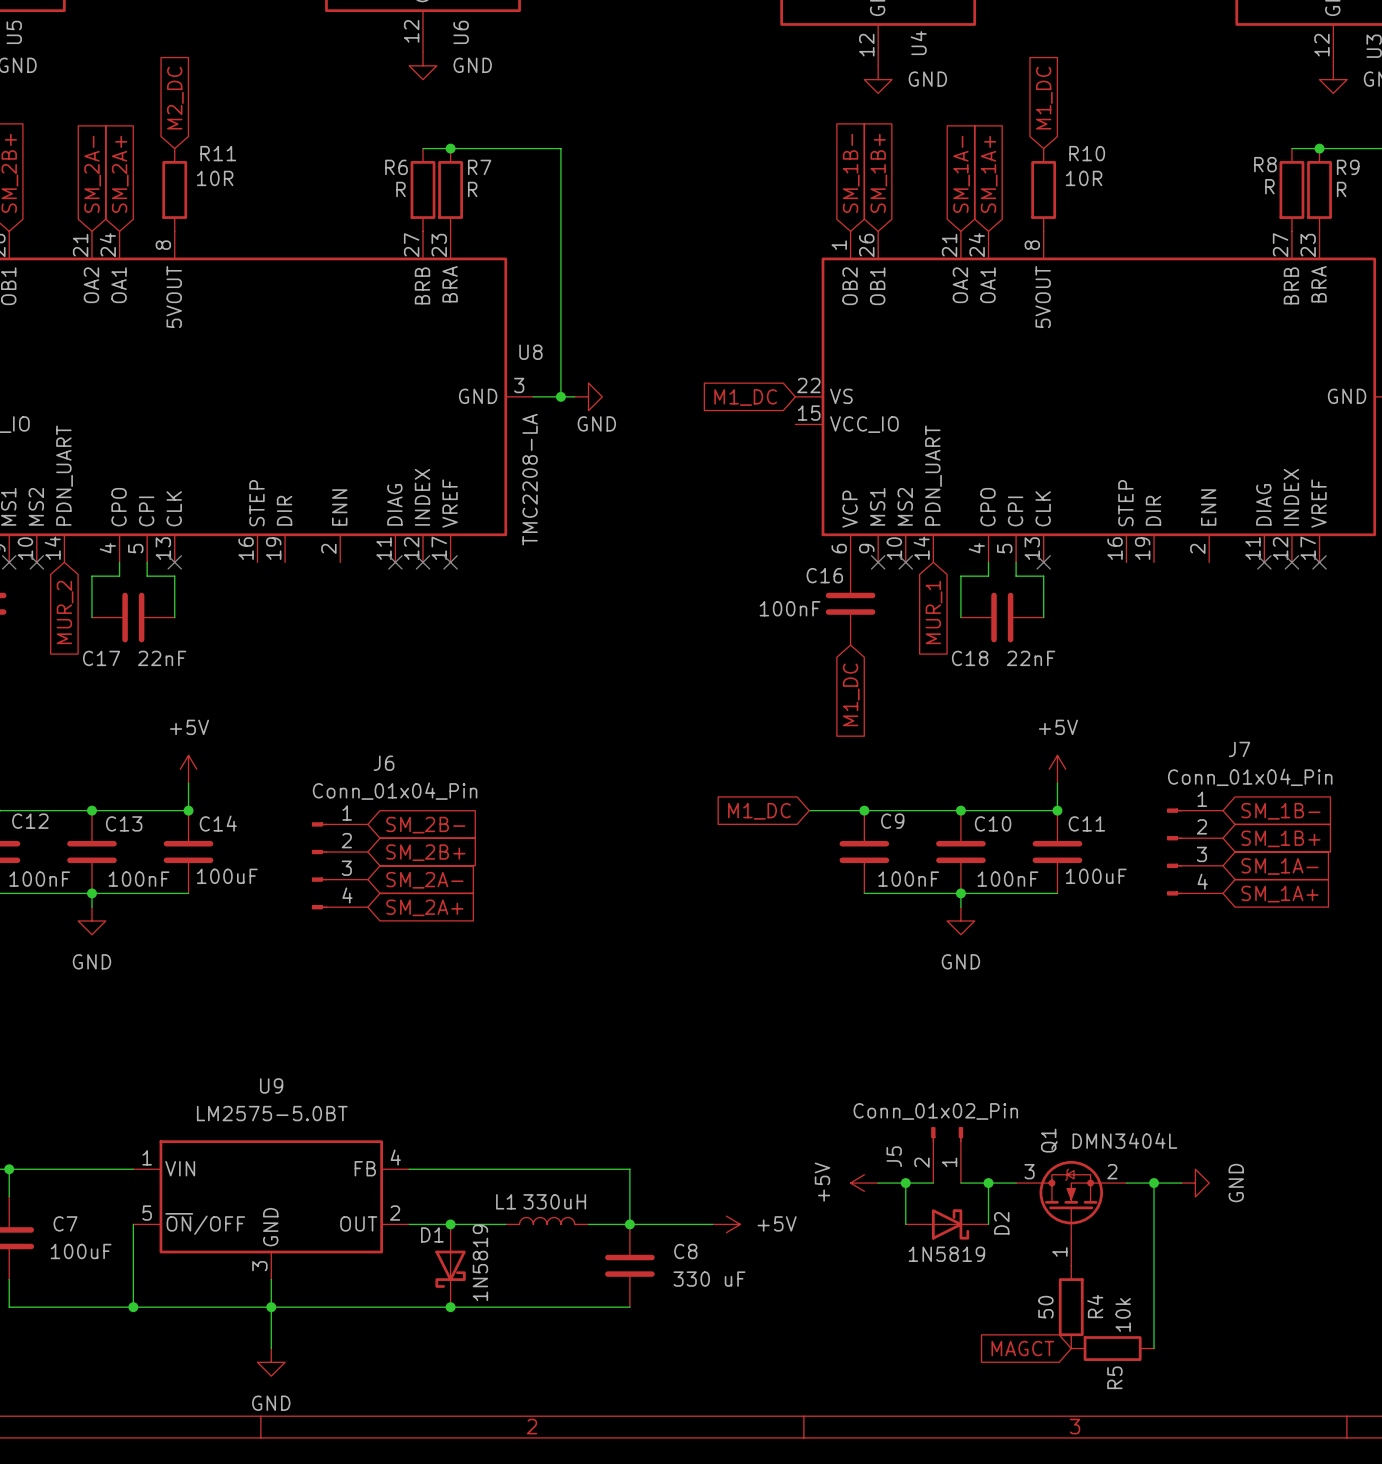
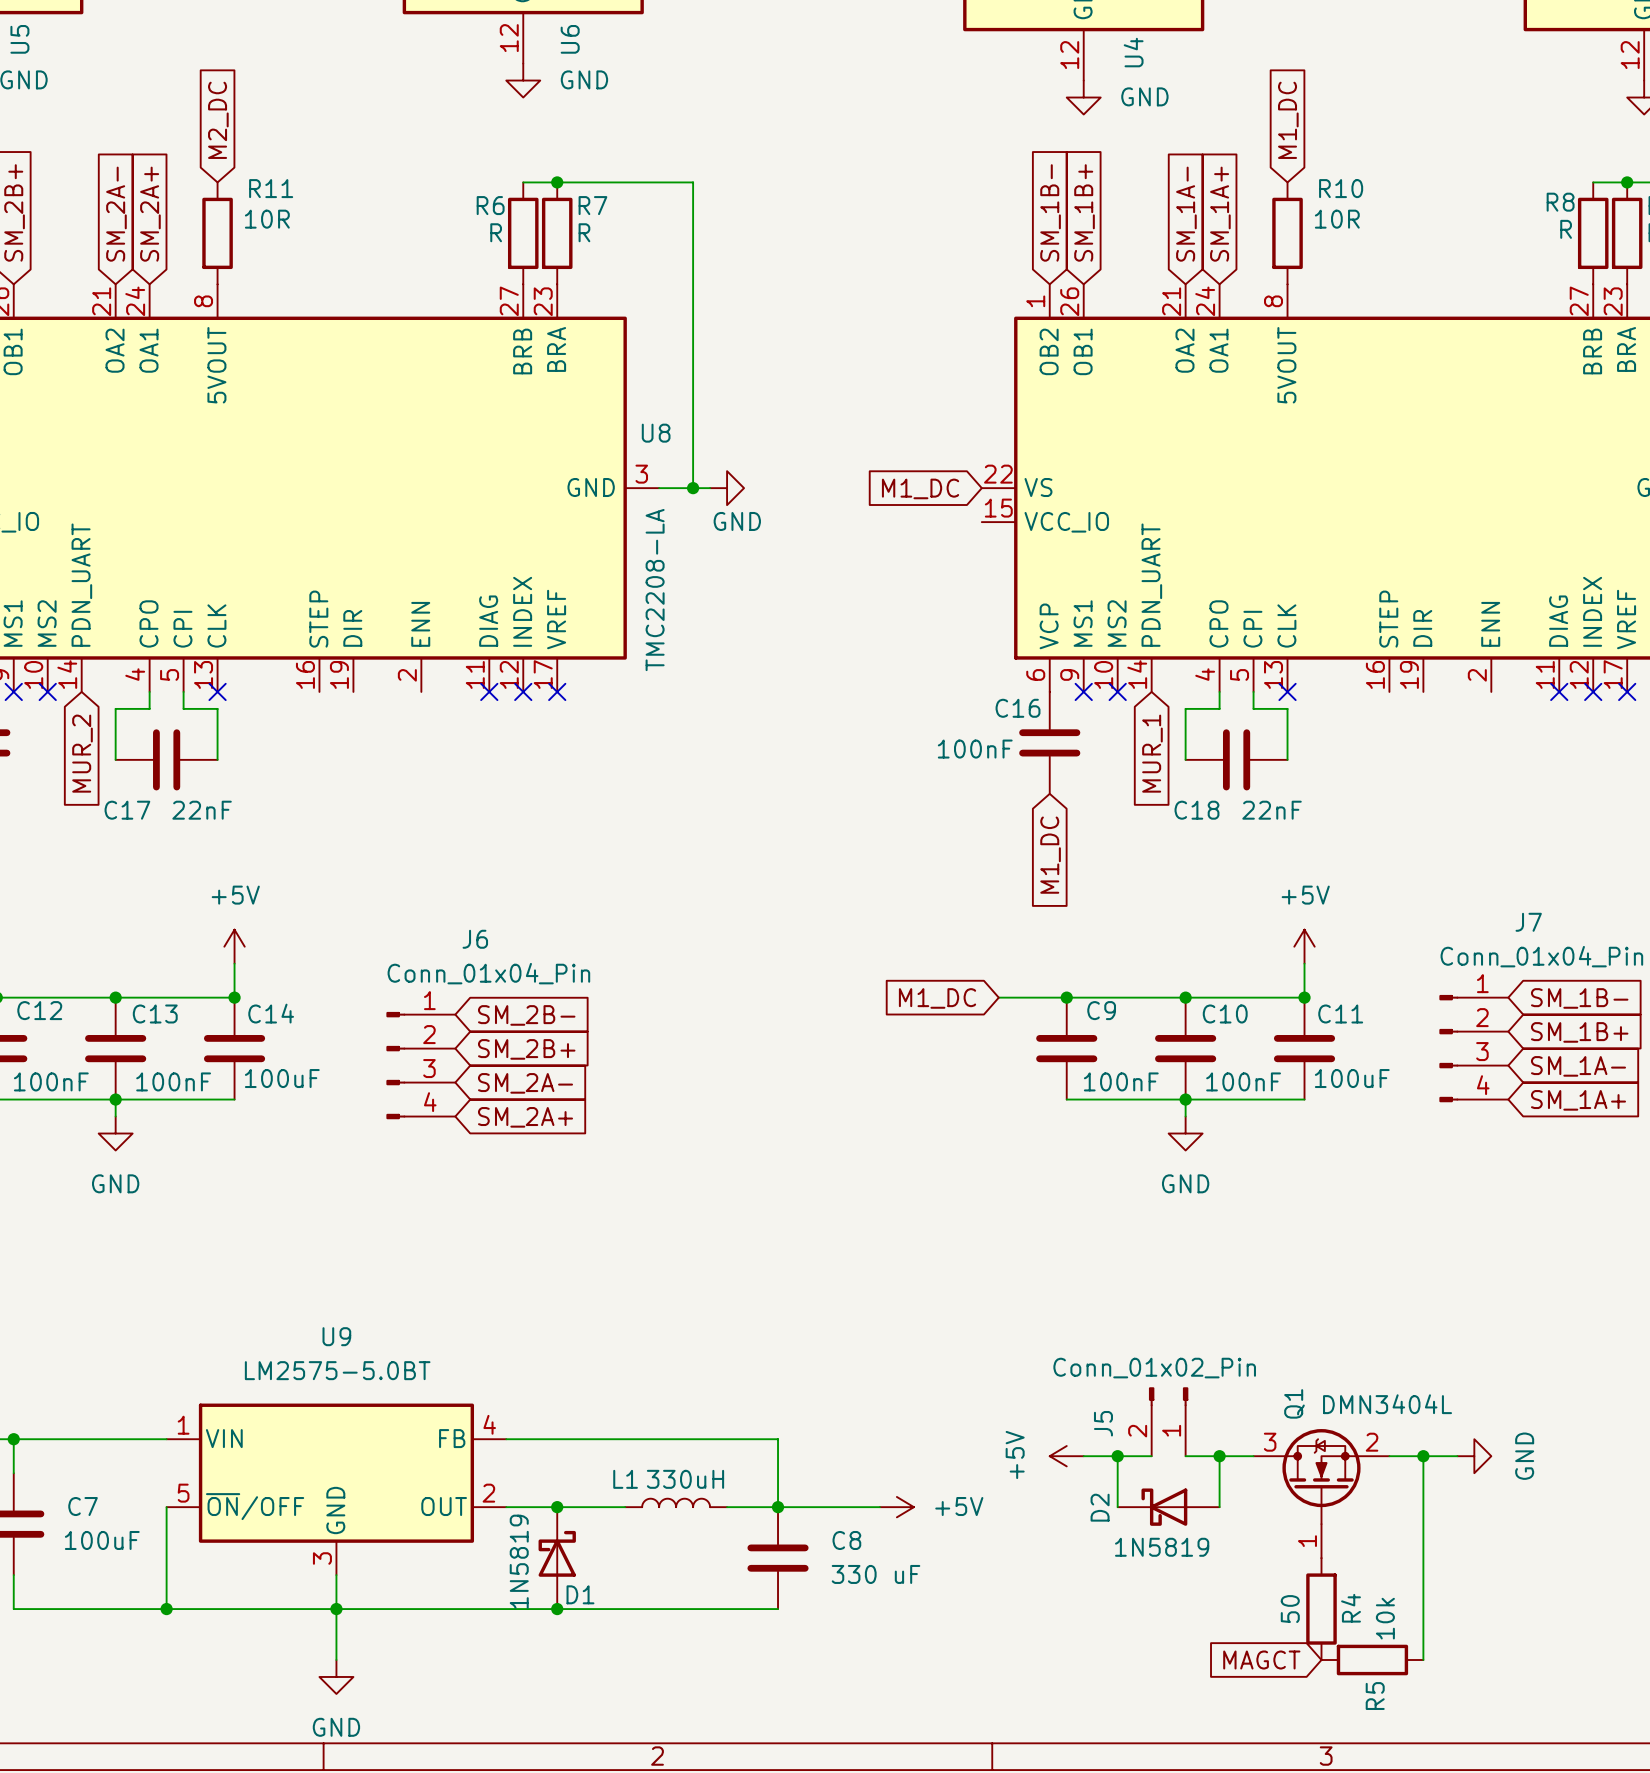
D2 rotation: 0° (950, 1224) -> 180° (1164, 1507)
D1 rotation: 0° (450, 1269) -> 180° (557, 1553)

